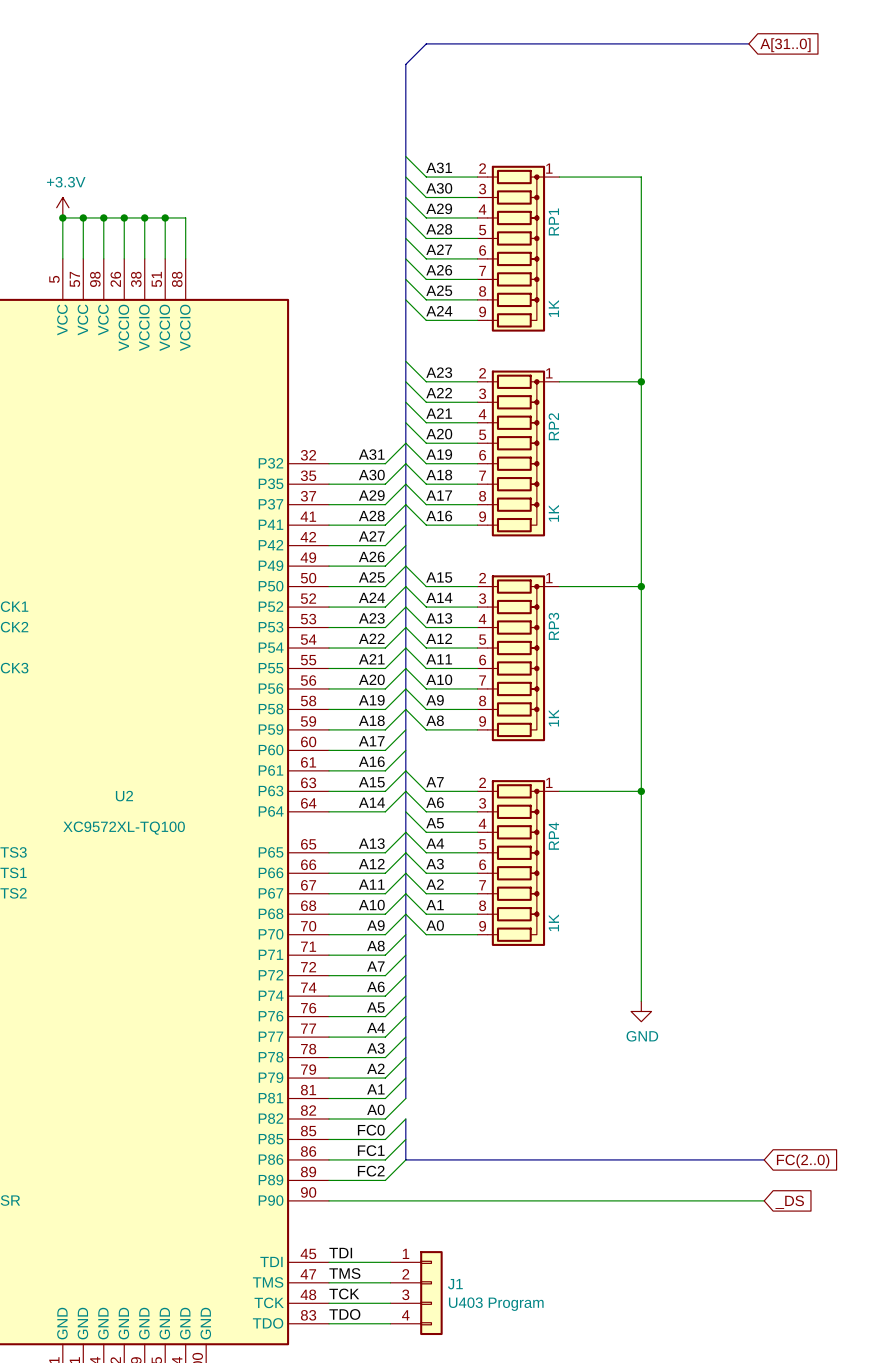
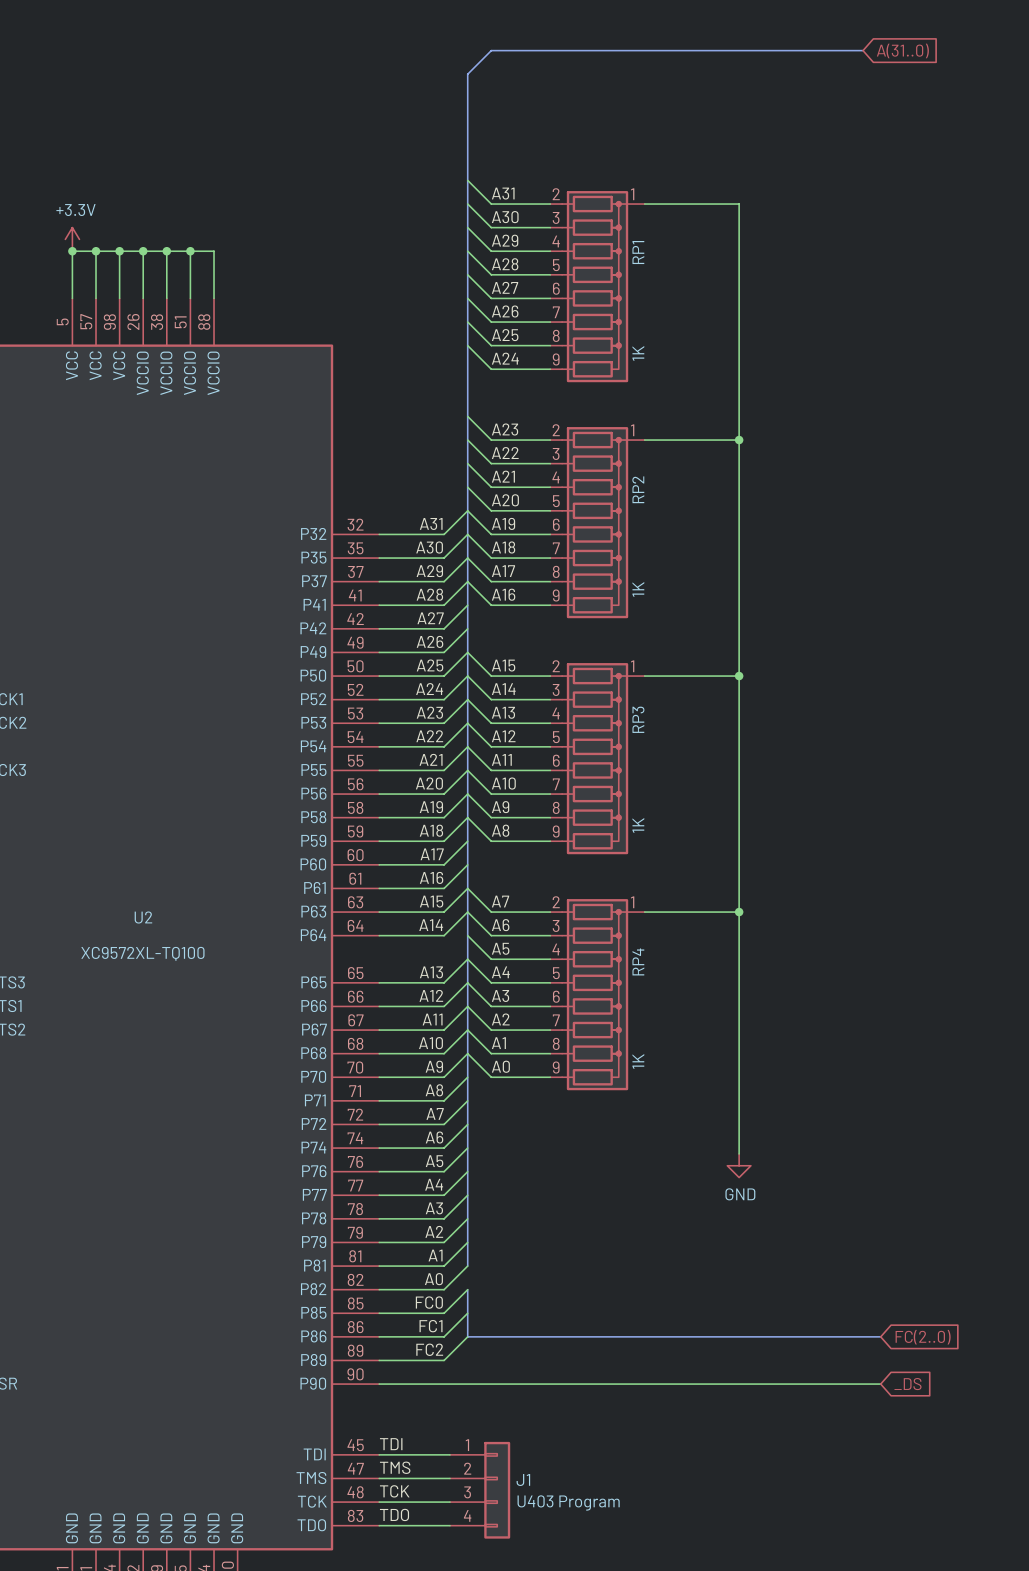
global label: A[31..0] (785, 45) -> A(31..0) (902, 50)

